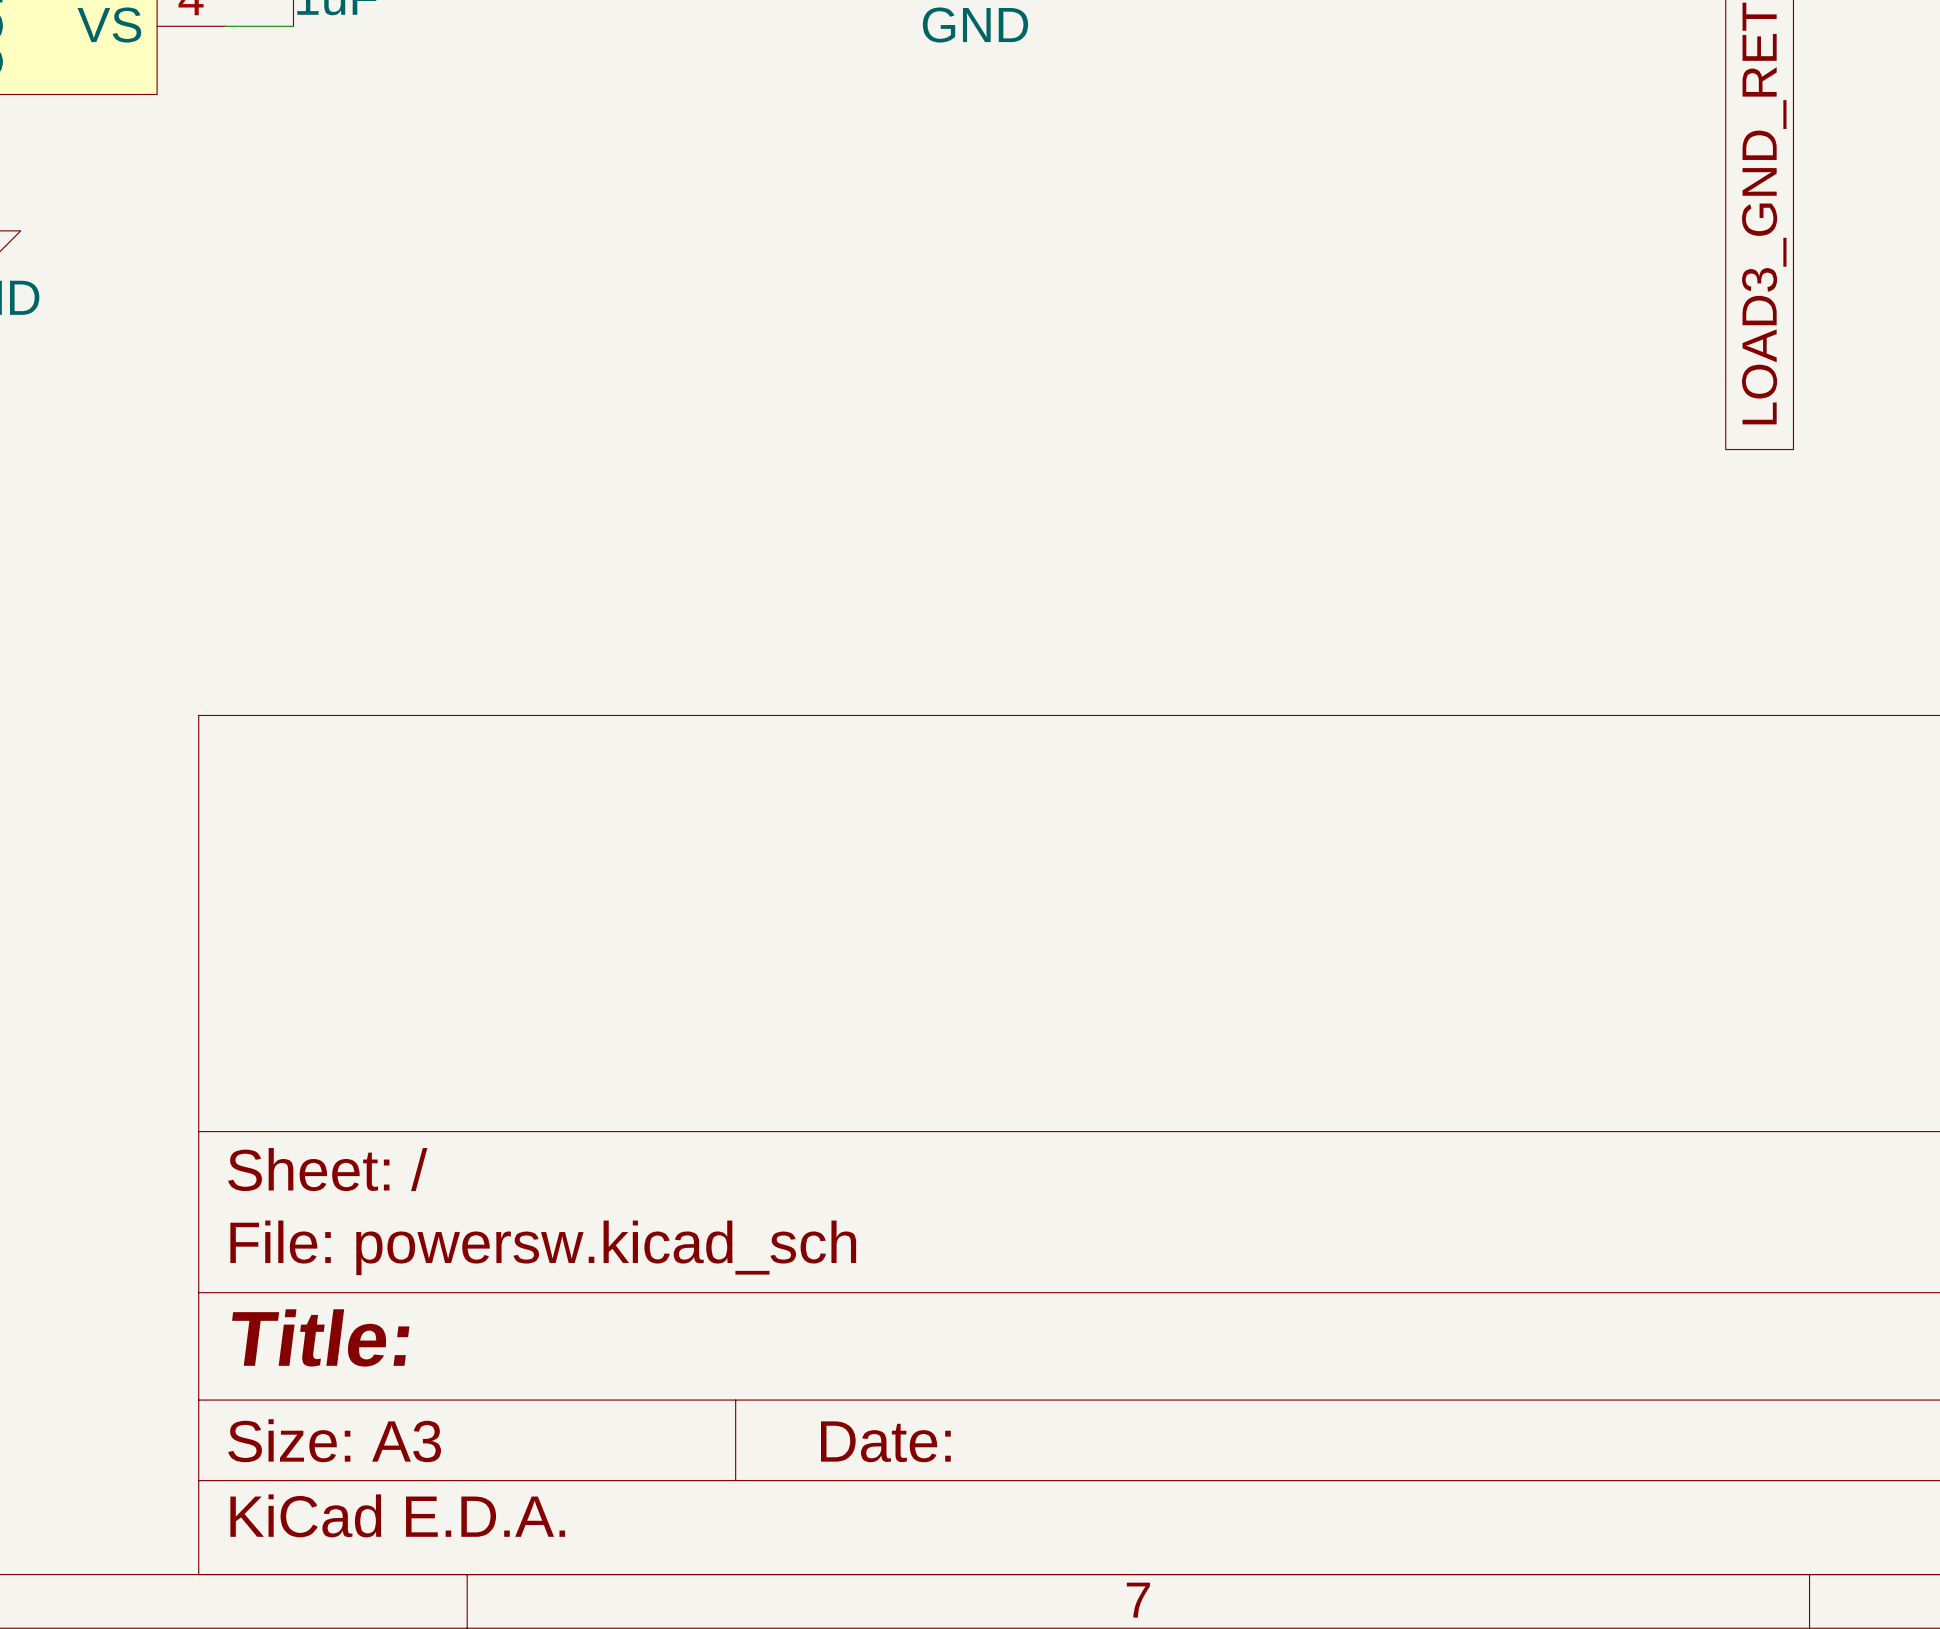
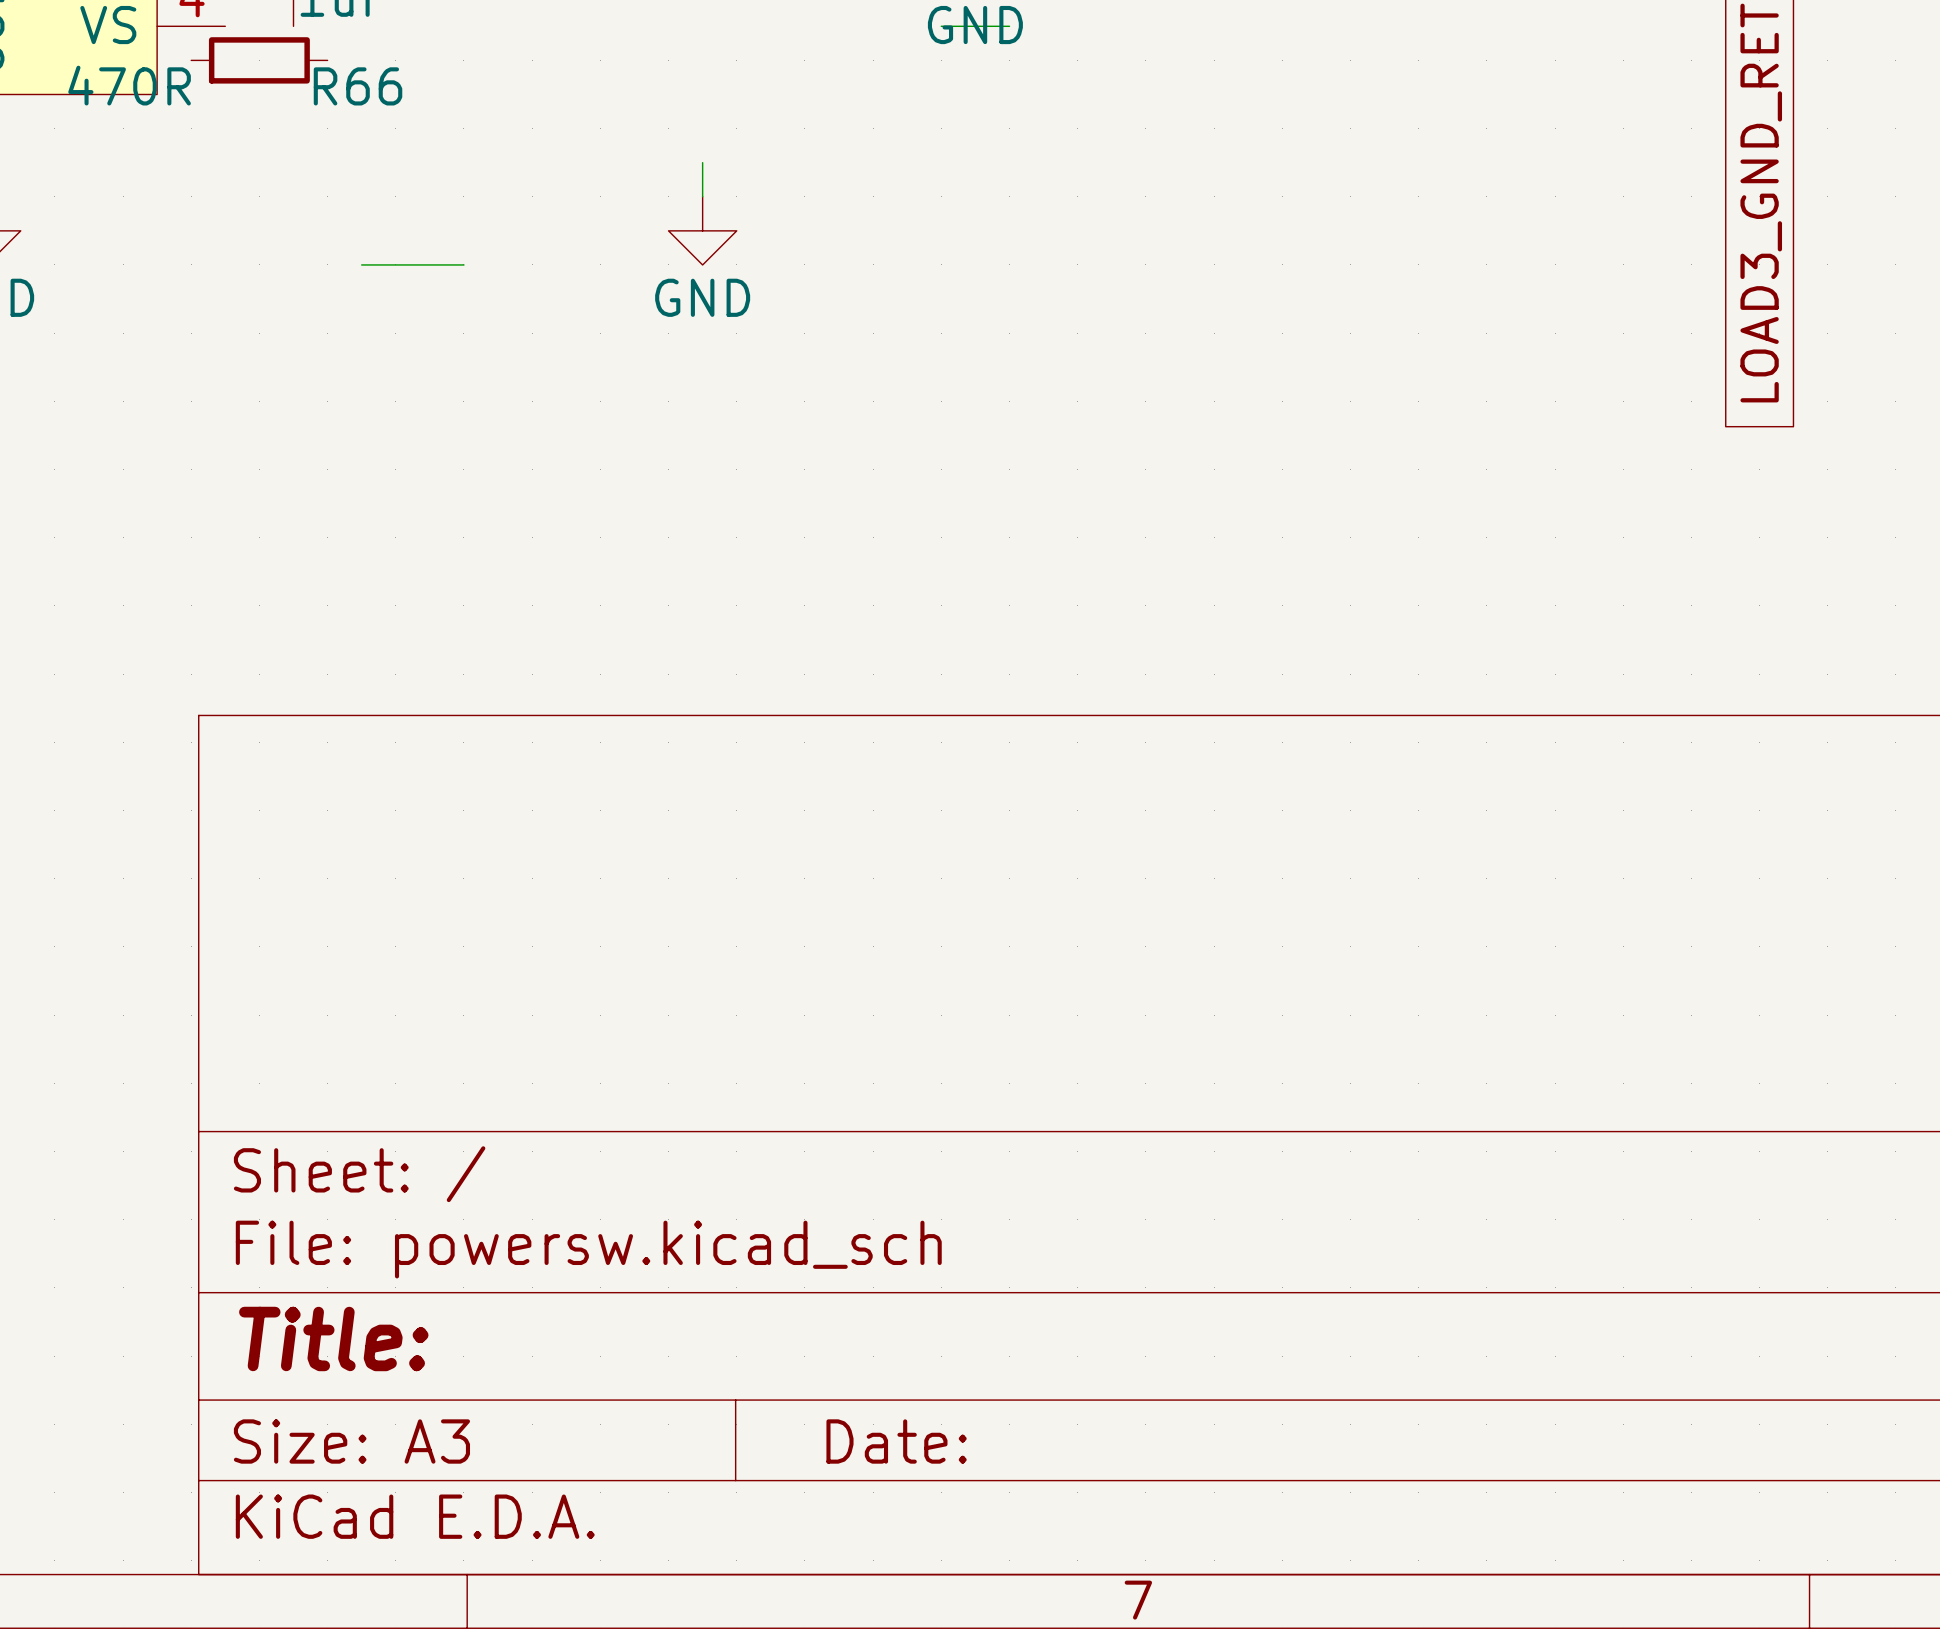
wire: (225, 26) (293, 26) -> none
wire: none -> (941, 26) (1009, 26)
R66: none -> 470R (259, 60)
wire: none -> (702, 162) (702, 196)
power symbol: none -> GND (702, 230)
wire: none -> (361, 264) (463, 264)

